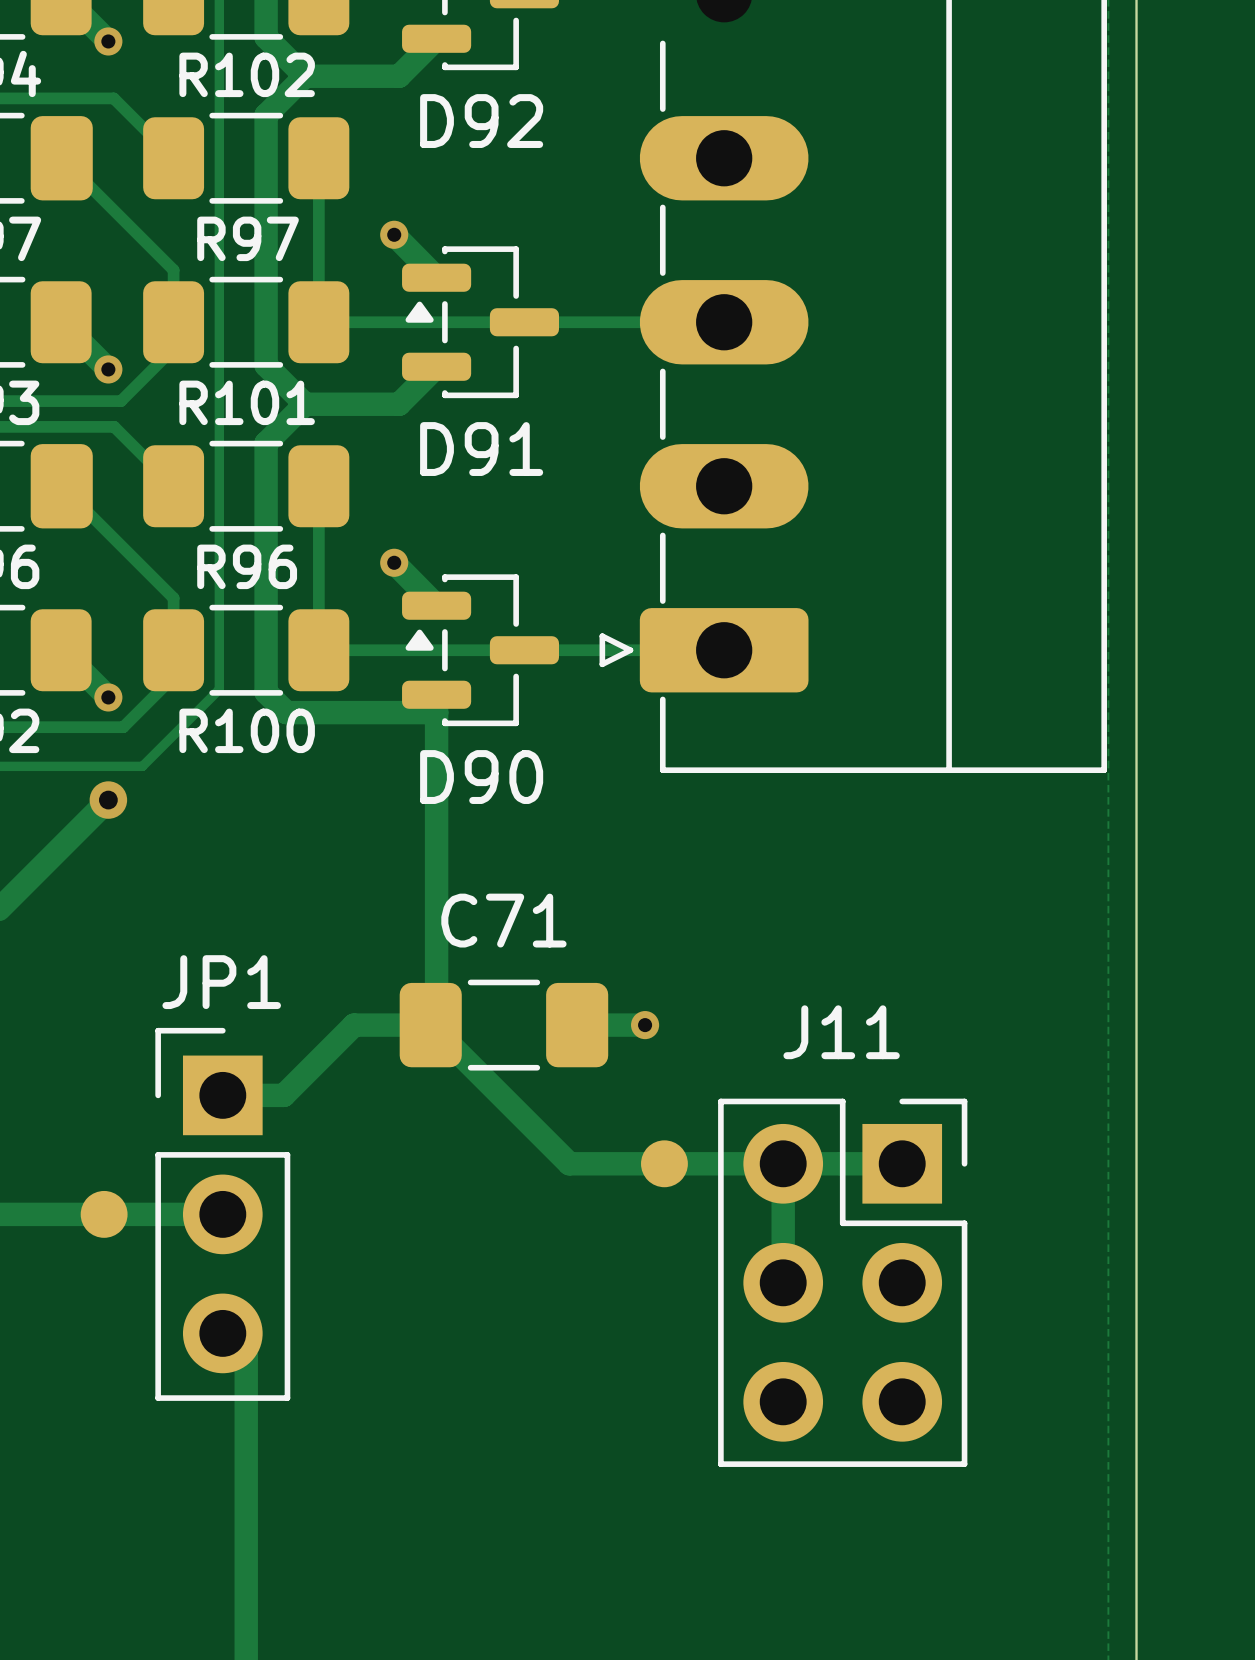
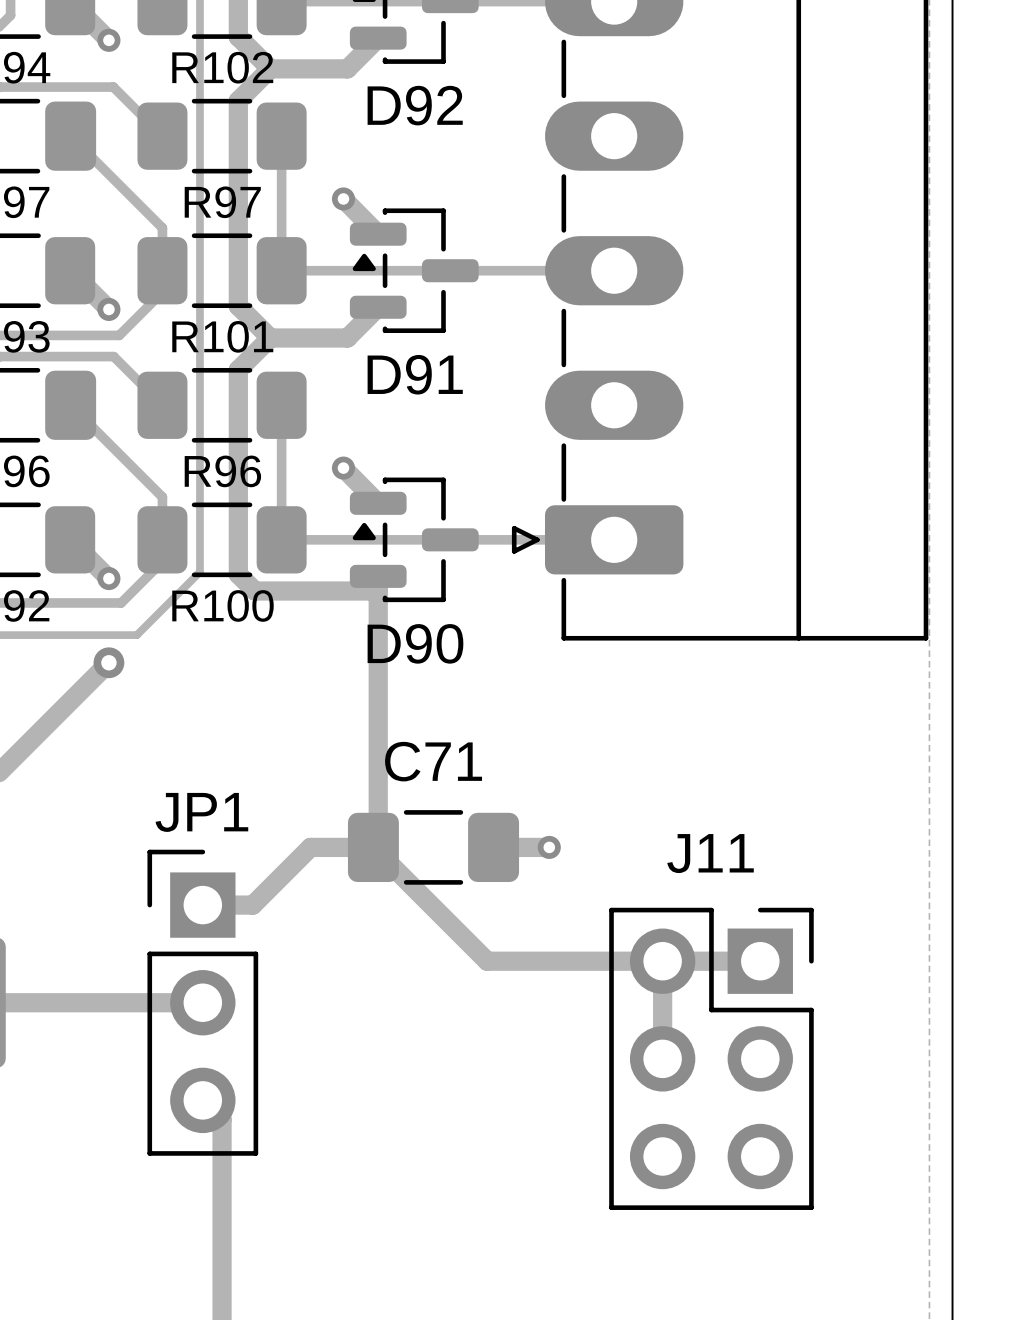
part: (664, 1163) -> none
part: (104, 1214) -> none

